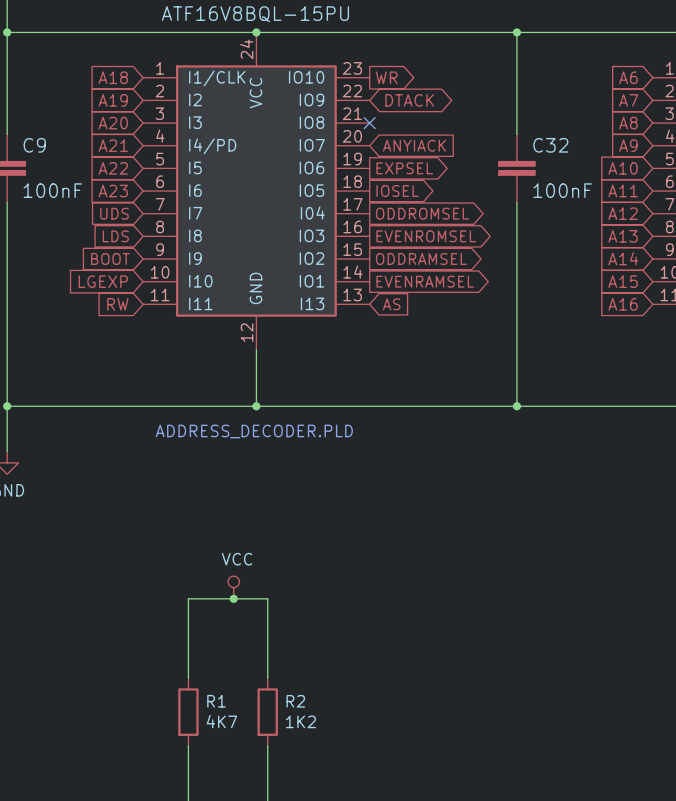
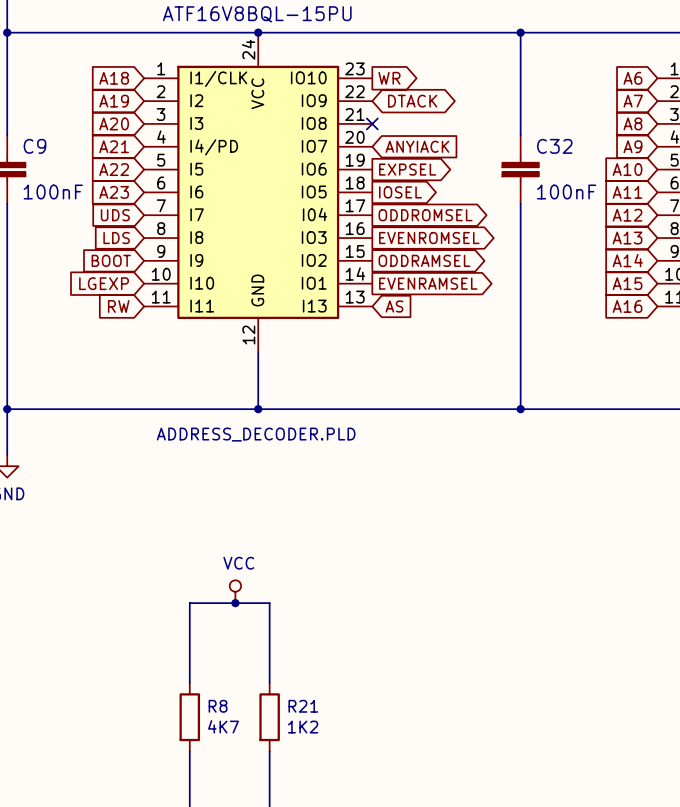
R1 name: R1 (216, 701) -> R8 (218, 706)
R2 name: R2 (295, 701) -> R21 (303, 706)

